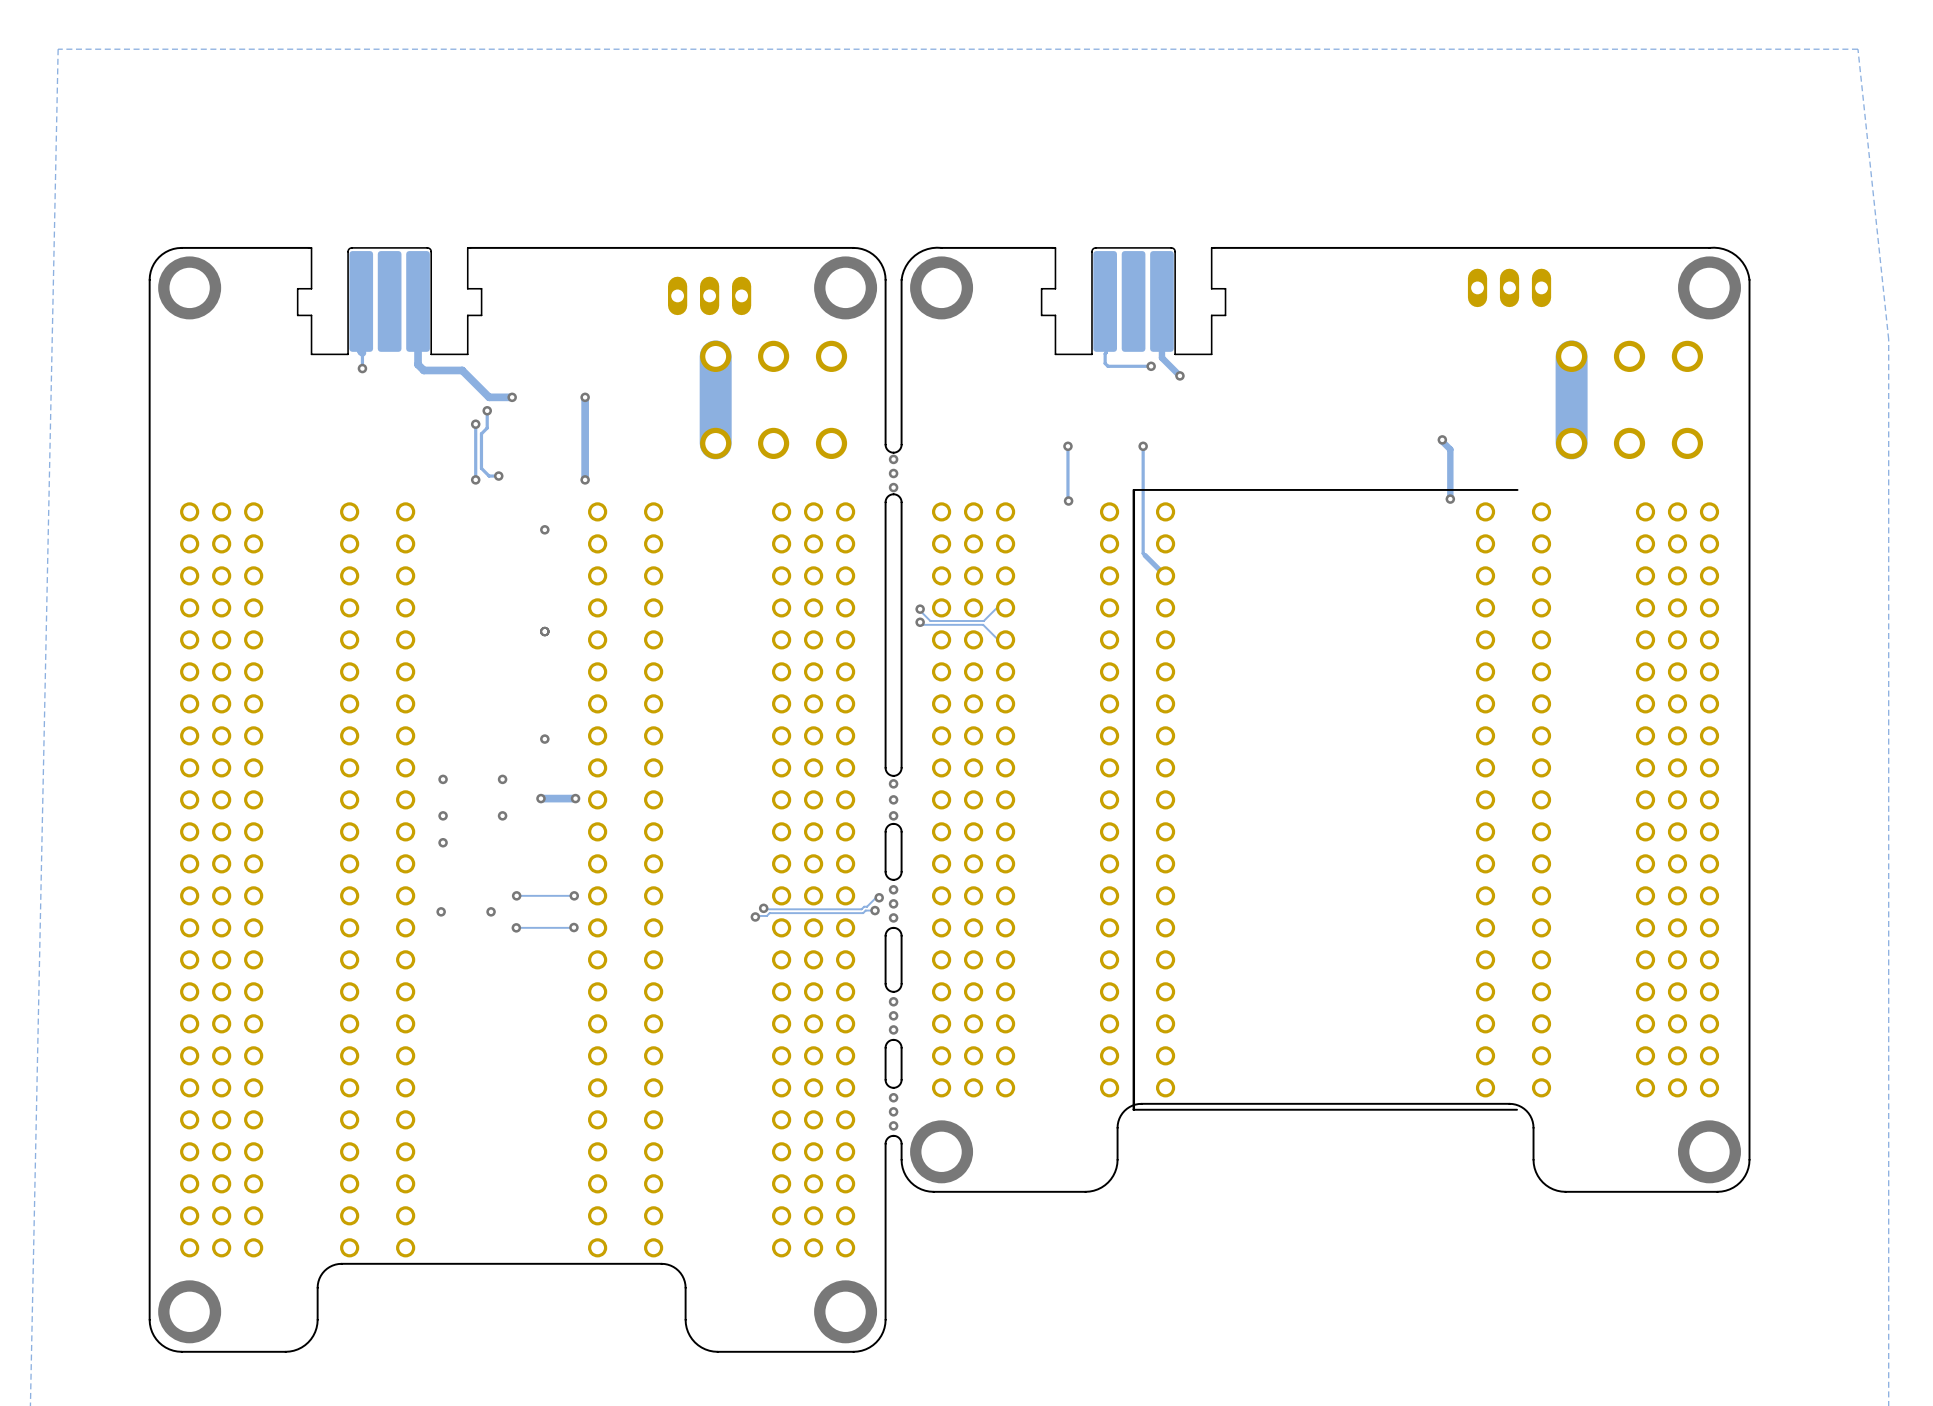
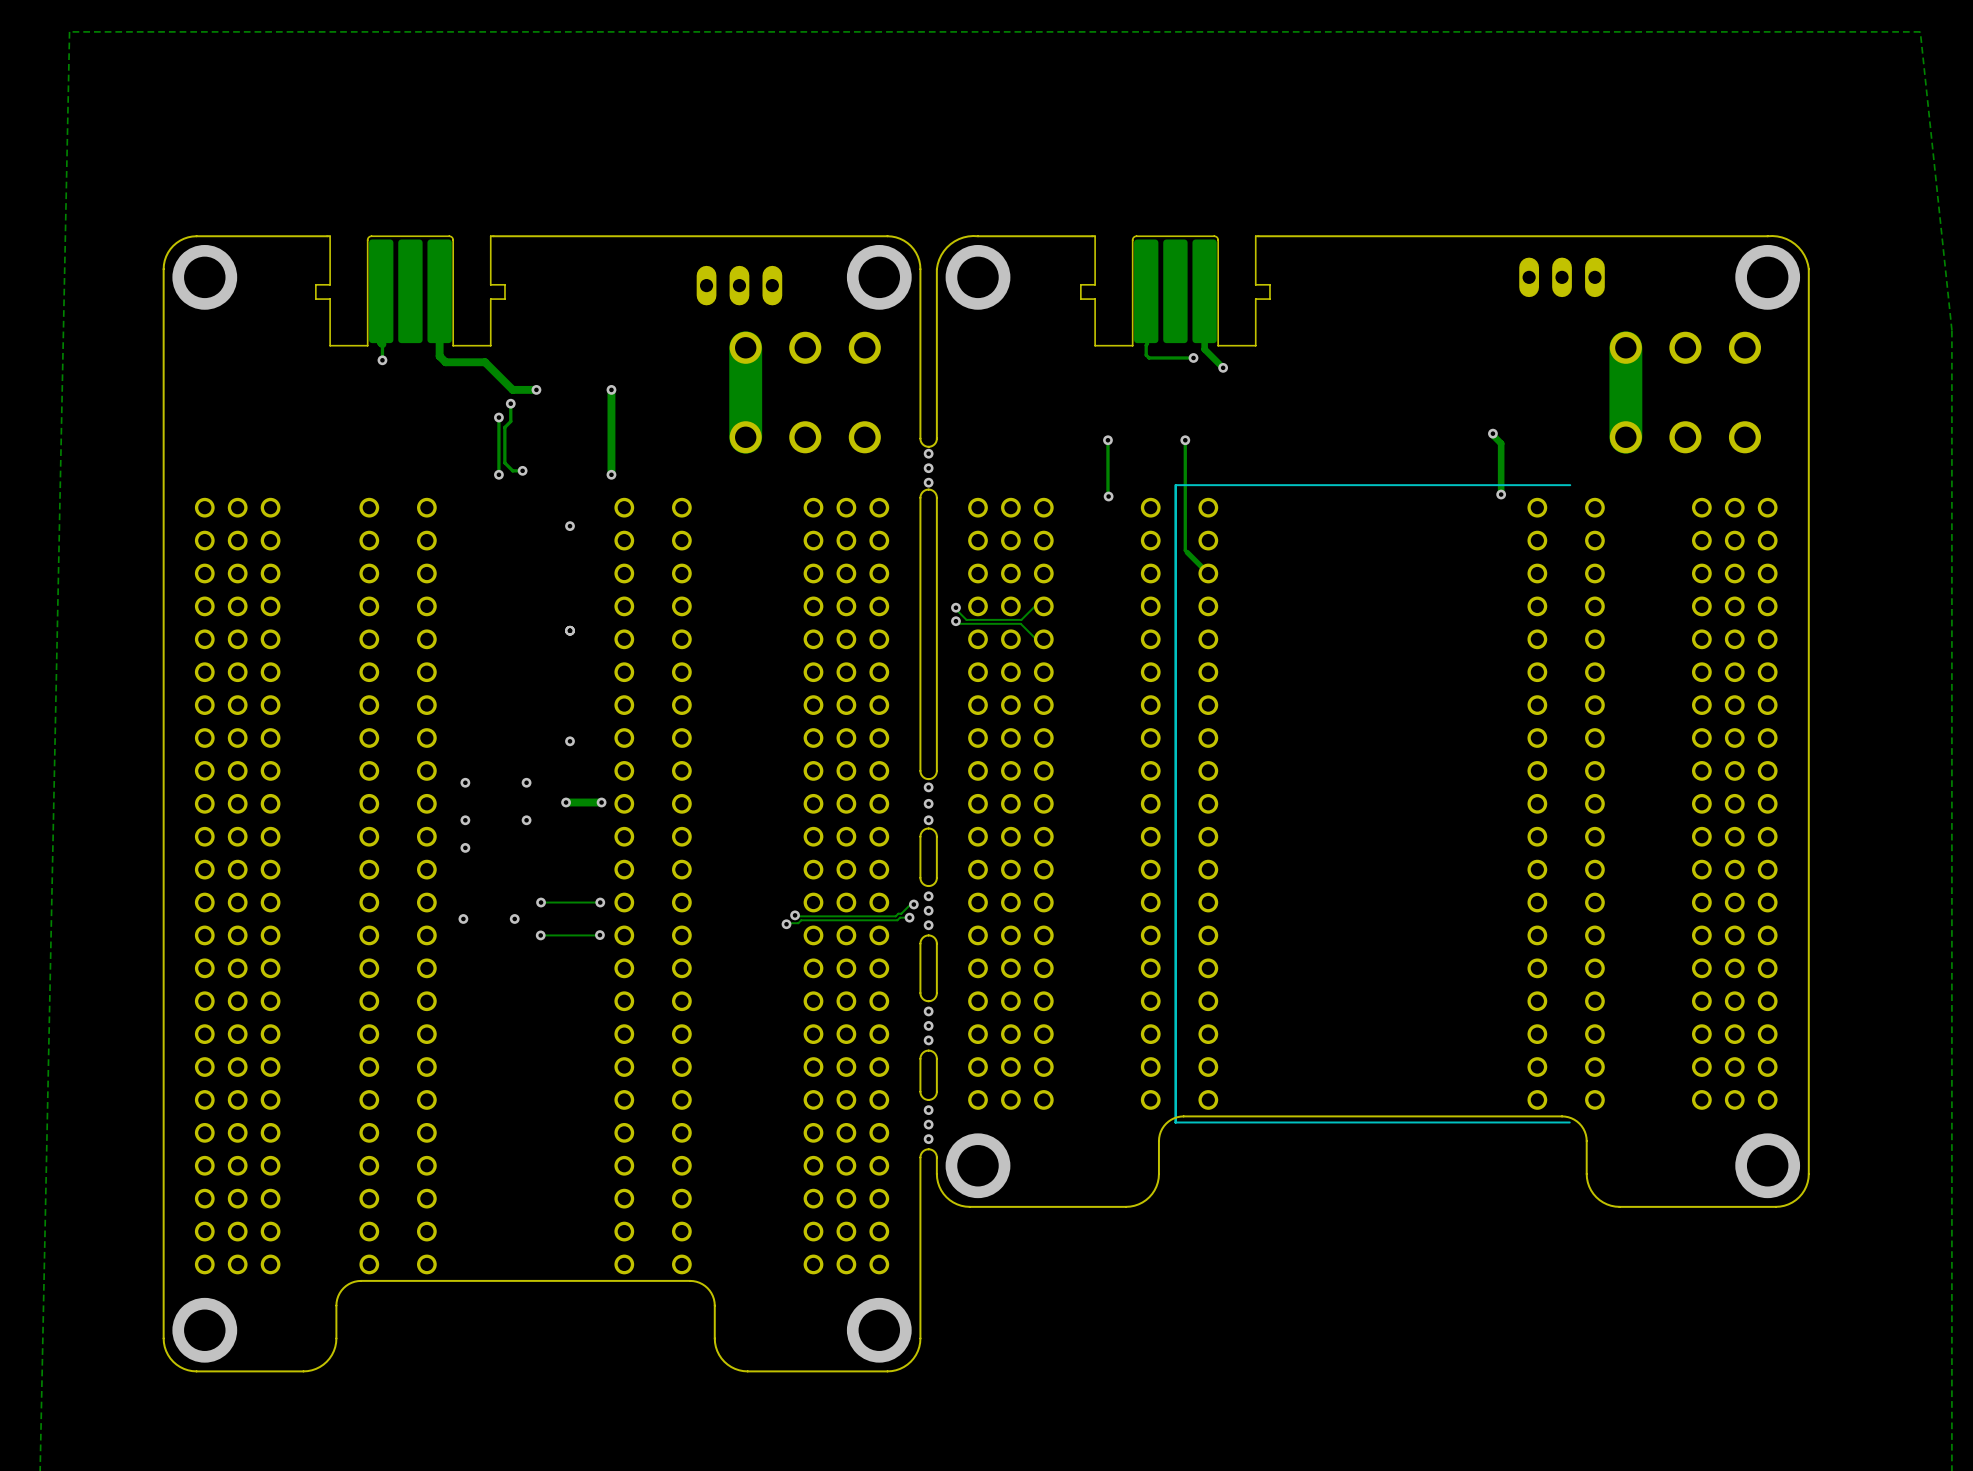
part footprint: [296, 247, 483, 356] -> [315, 235, 506, 347]
part footprint: [1040, 247, 1227, 356] -> [1080, 235, 1271, 347]

